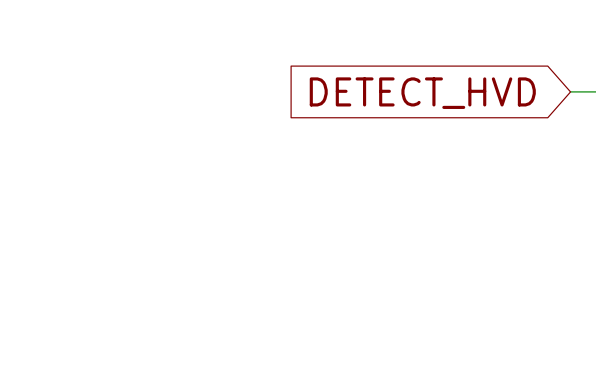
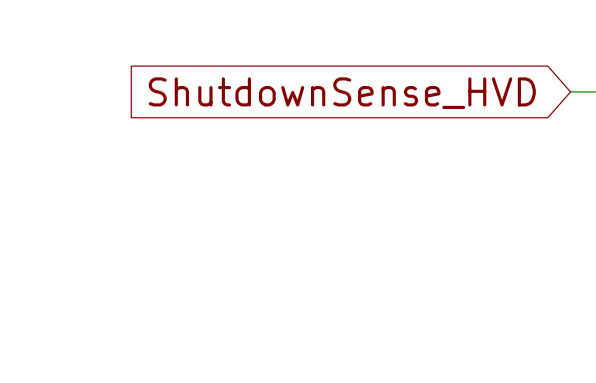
global label: DETECT_HVD (422, 93) -> ShutdownSense_HVD (342, 93)

